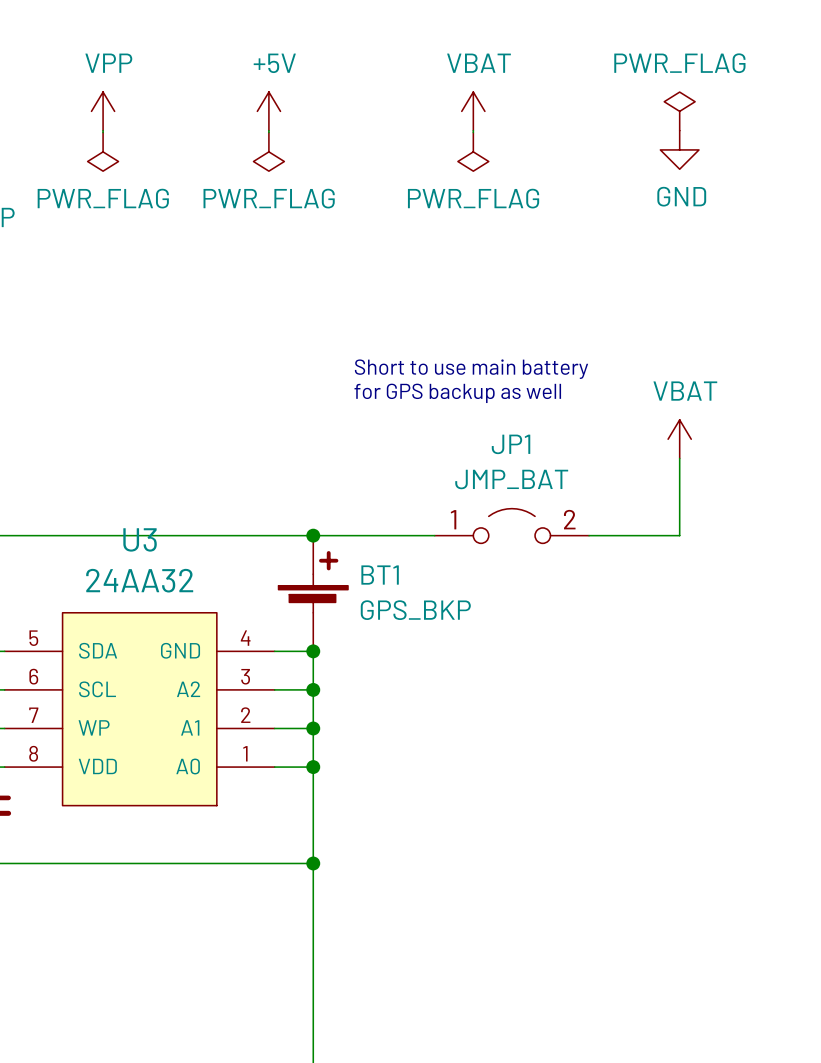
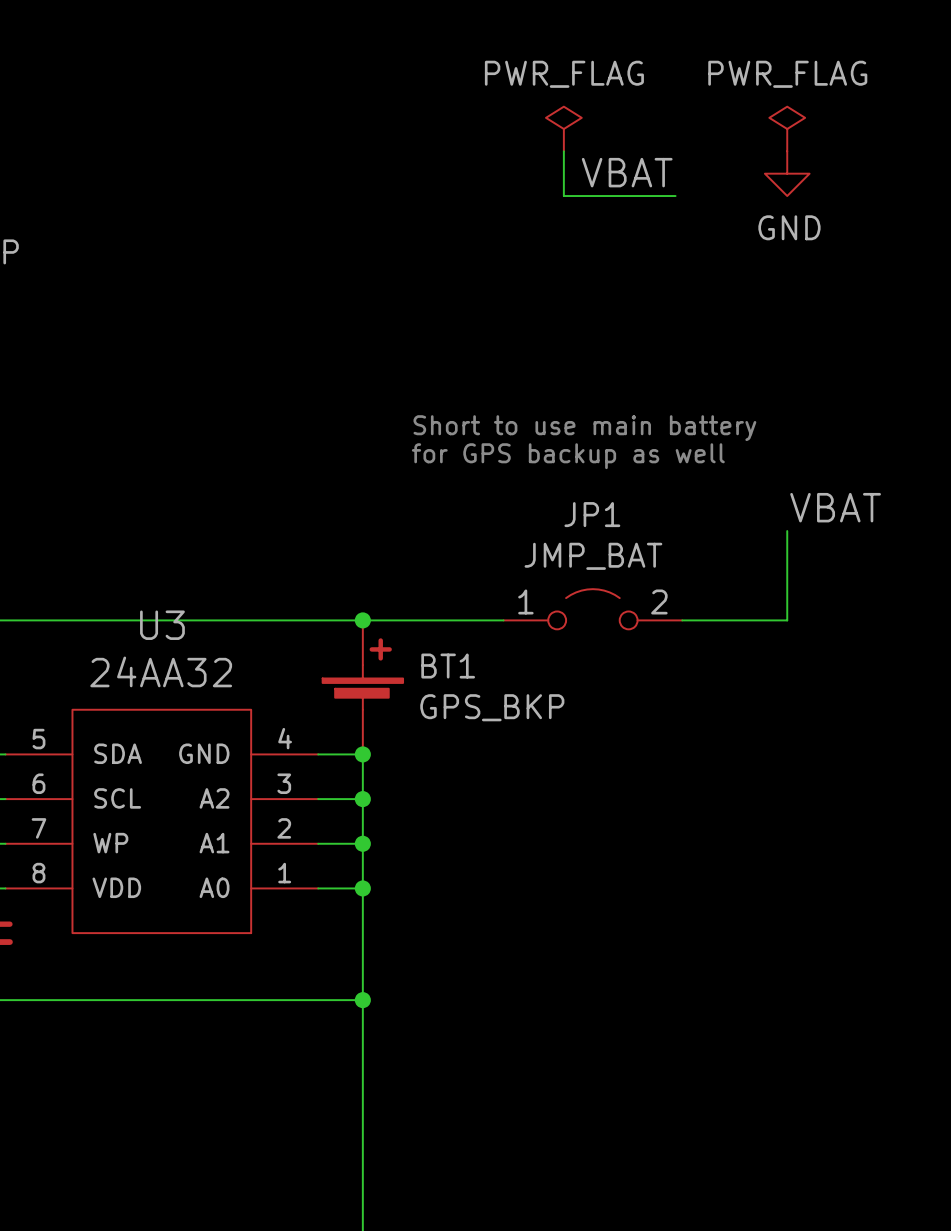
power symbol: VPP (103, 111) -> none
power symbol: +5V (268, 111) -> none
power symbol: VBAT (473, 111) -> PWR_FLAG (563, 129)
wire: (103, 130) (103, 132) -> none
wire: (268, 130) (268, 132) -> none
wire: (473, 130) (473, 132) -> none
wire: none -> (563, 151) (563, 196) (675, 196)
label: none -> VBAT (627, 172)
power symbol: PWR_FLAG (103, 151) -> none
power symbol: PWR_FLAG (268, 151) -> none
power symbol: PWR_FLAG (473, 151) -> none
label: none -> VBAT (835, 507)
power symbol: VBAT (679, 439) -> none

